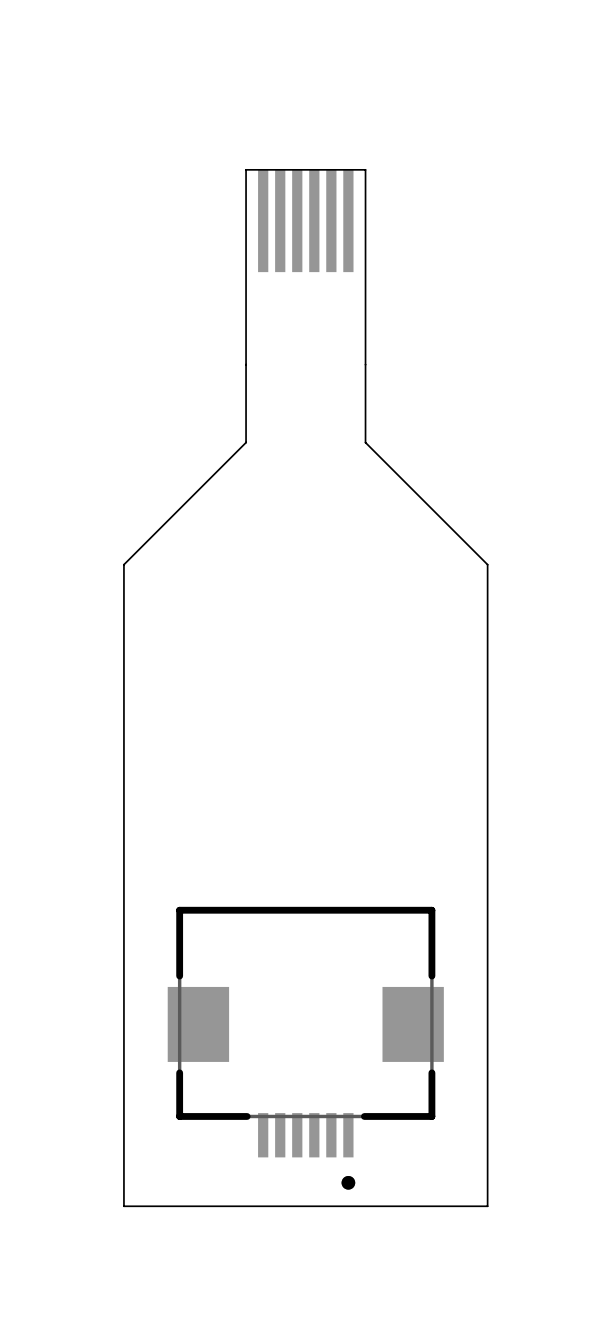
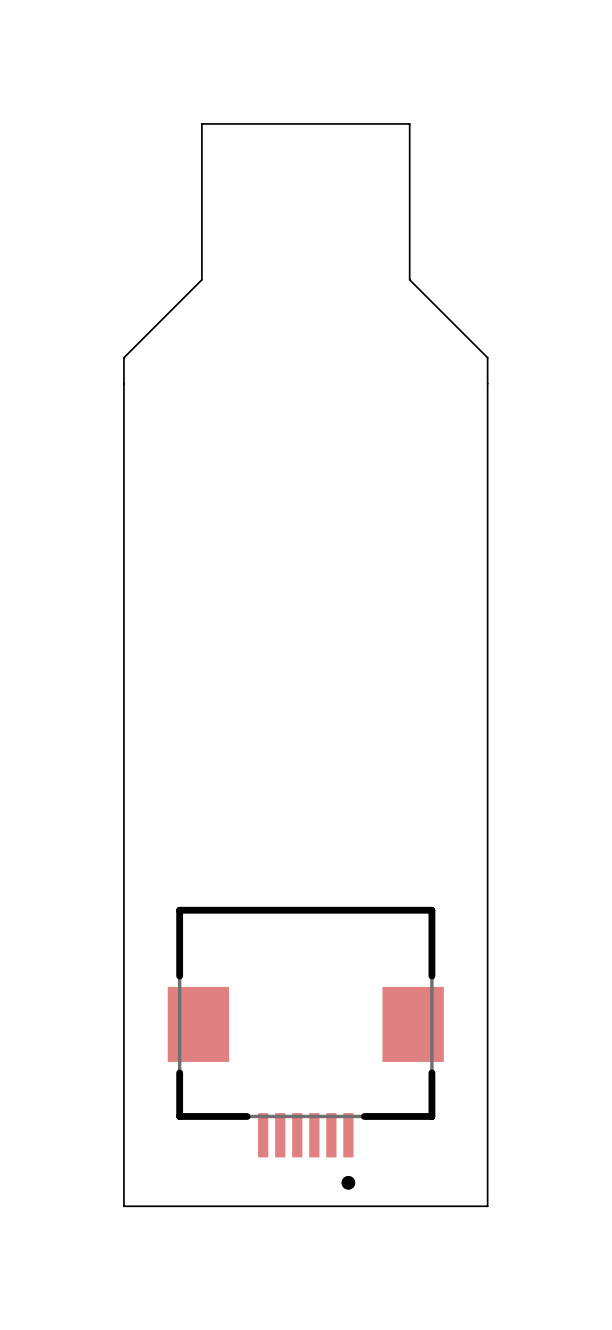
part: (305, 220) -> none
board edge: (123, 564) (246, 442) (246, 169) (365, 169) (365, 442) (487, 564) -> (123, 564) (123, 357) (201, 279) (201, 123) (409, 123) (409, 279) (487, 357) (487, 564)

